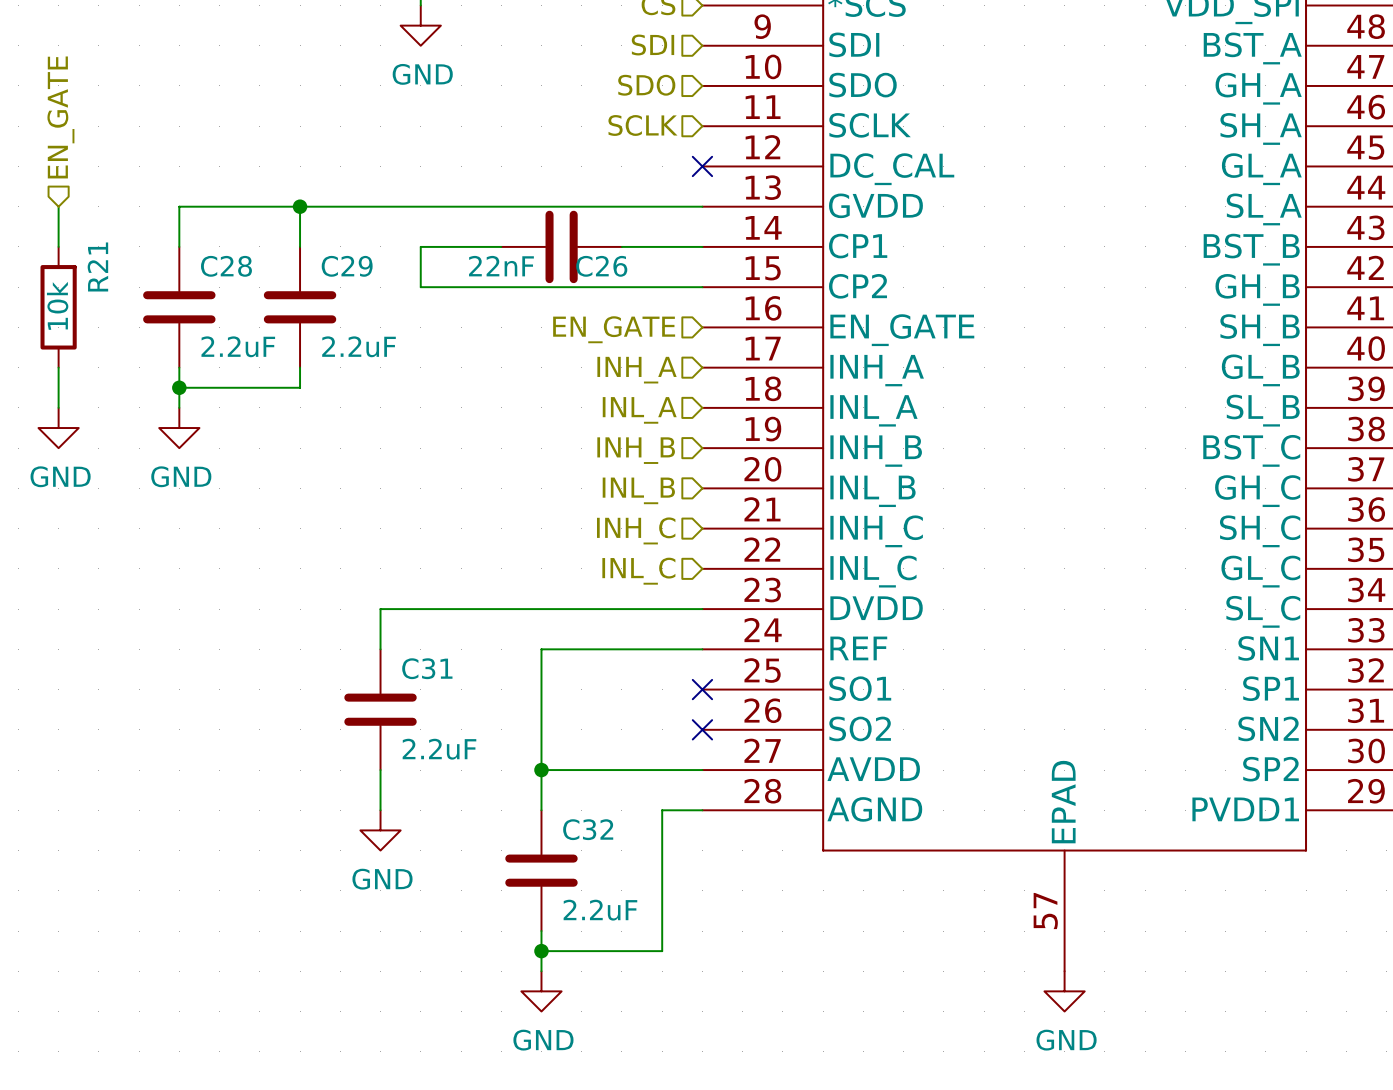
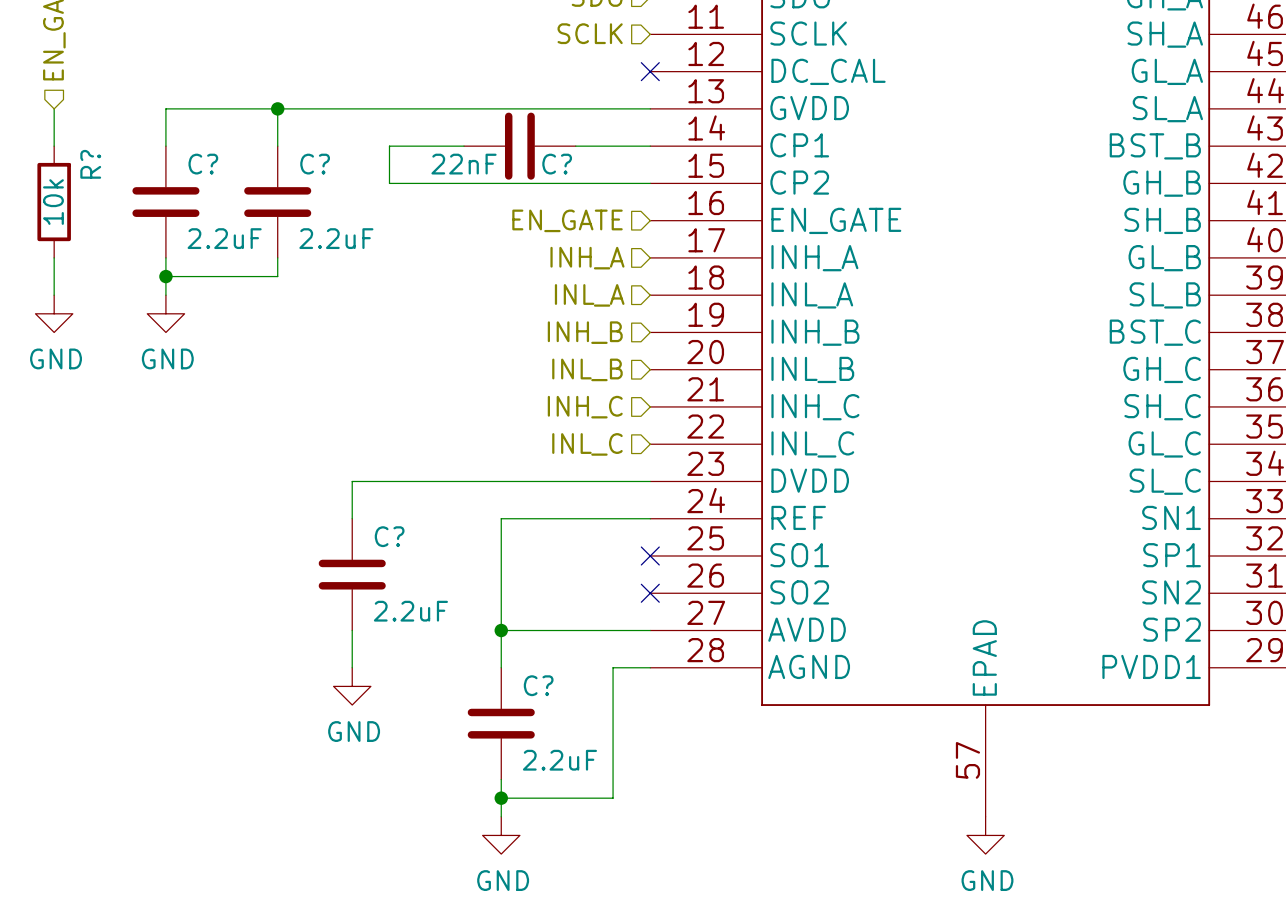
R21 name: R21 (97, 266) -> R? (90, 164)
C28 name: C28 (226, 266) -> C? (203, 164)
C29 name: C29 (347, 266) -> C? (315, 164)
C26 name: C26 (601, 266) -> C? (557, 164)
C31 name: C31 (427, 668) -> C? (389, 536)
C32 name: C32 (588, 829) -> C? (538, 685)

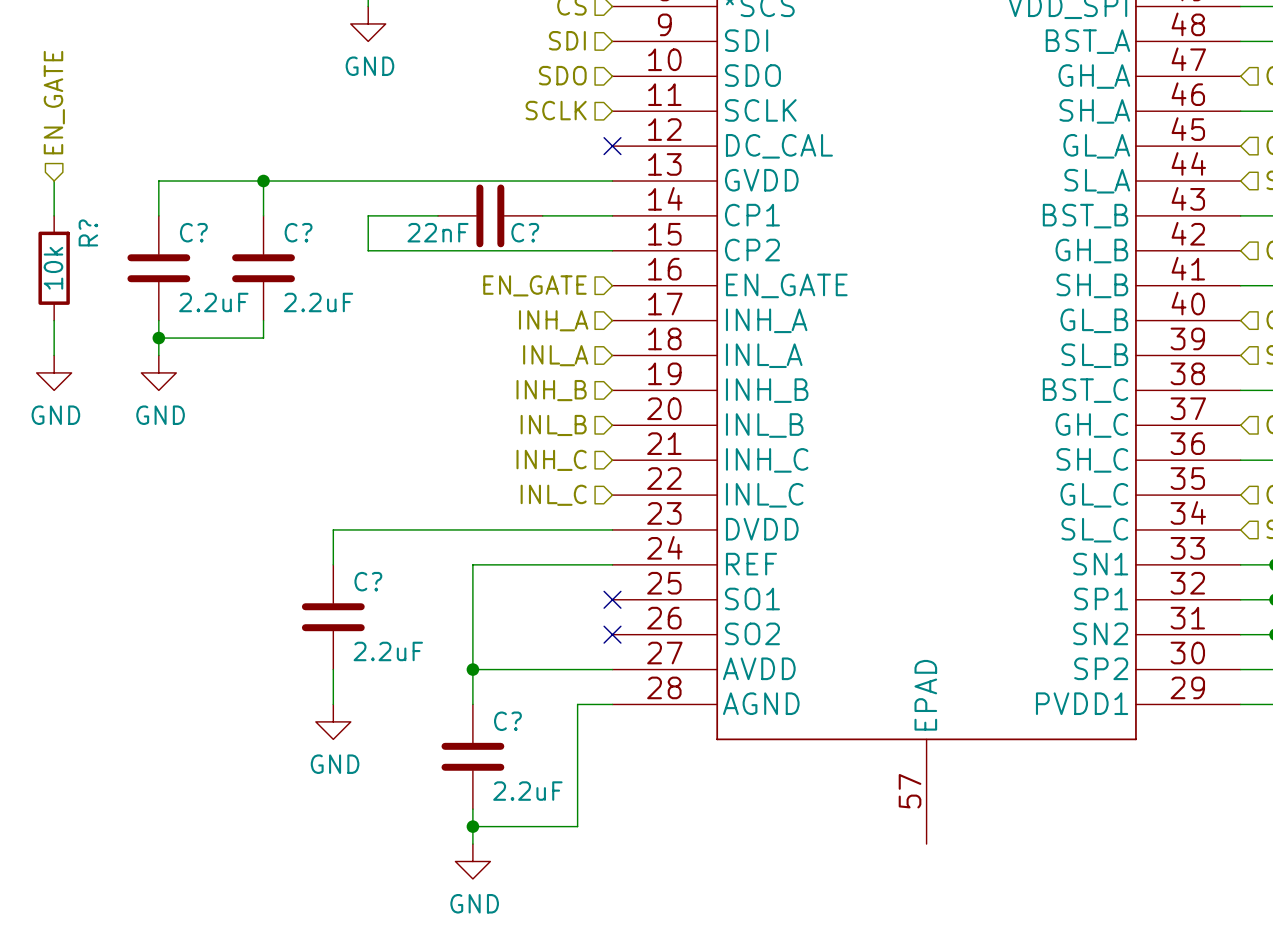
power symbol: GND (985, 835) -> none

